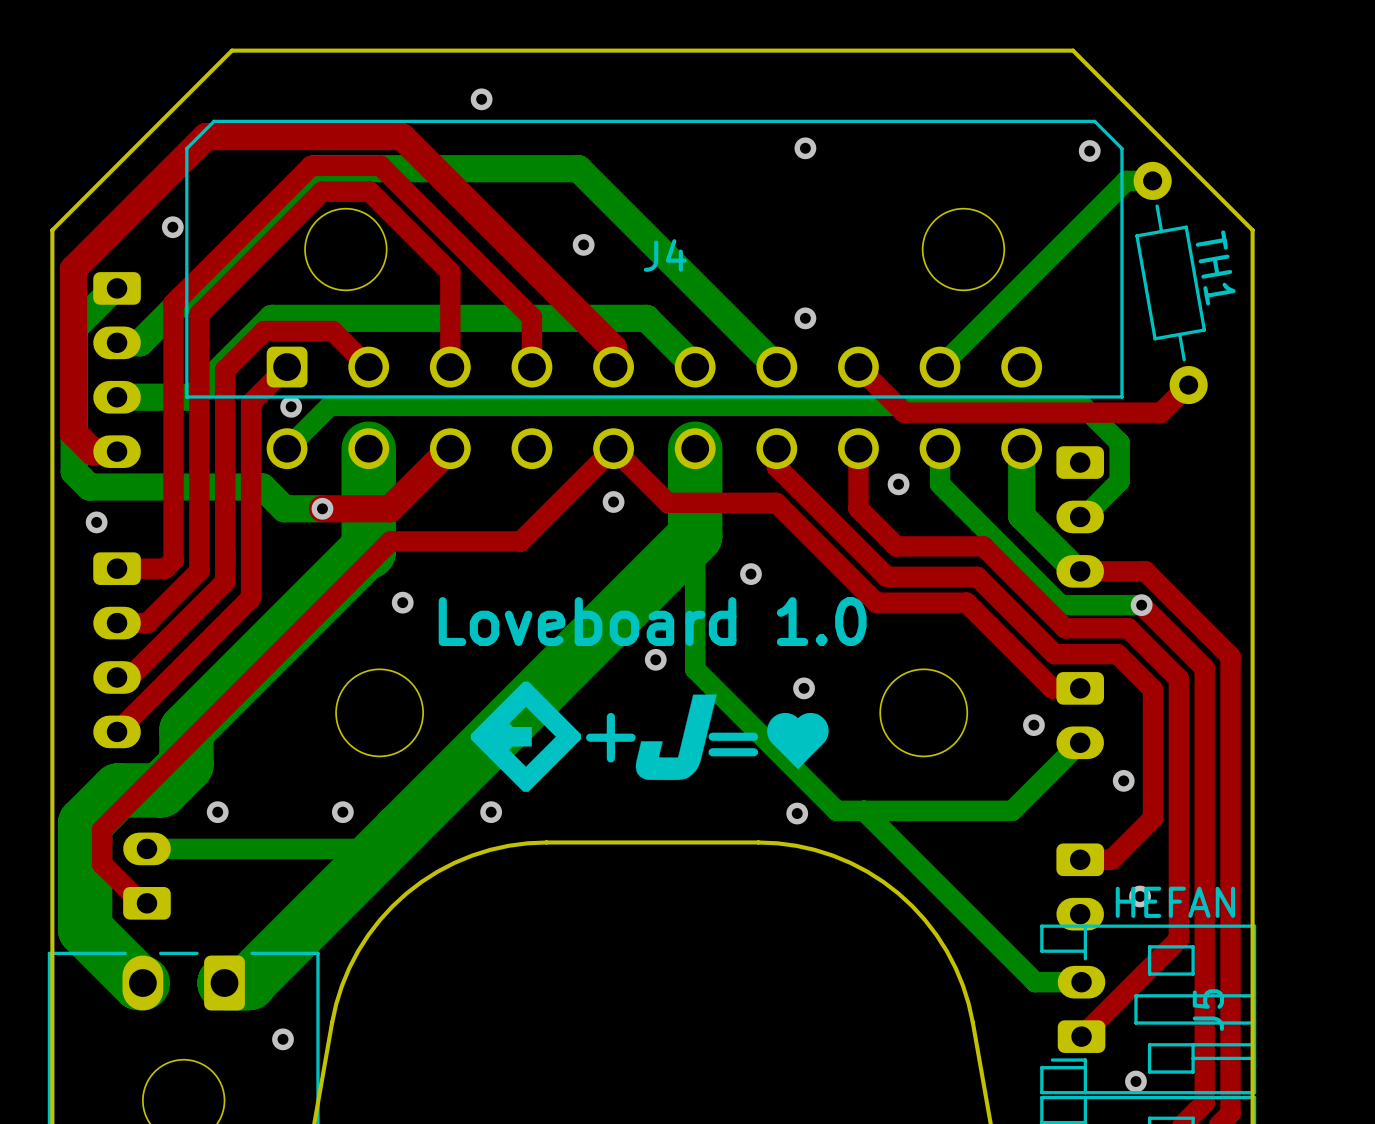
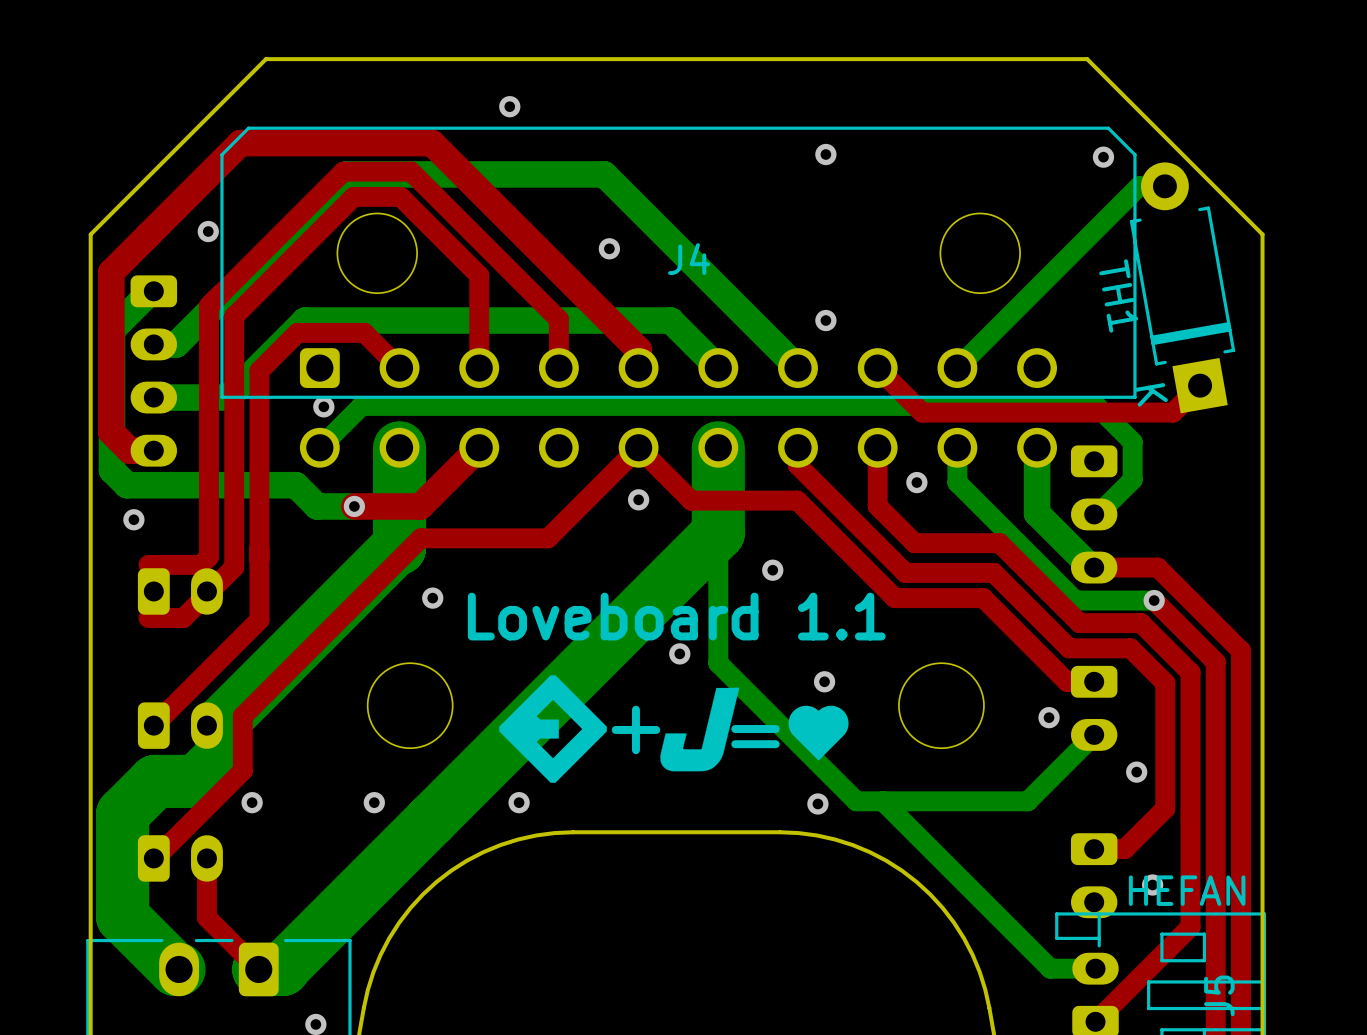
TH1 footprint: [1133, 161, 1208, 405] -> [1129, 162, 1236, 414]
TH1 name position: TH1 (1215, 267) -> TH1 (1118, 295)
top track: (287, 367) (251, 403) (251, 597) (117, 731) -> none
top track: (225, 581) (129, 677) (111, 677) -> (259, 577) (259, 620) (153, 725)
part: none -> (180, 591)
text: Loveboard 1.0 (652, 621) -> Loveboard 1.1 (676, 616)
part: (117, 650) -> none
top track: (208, 723) (102, 829) (102, 863) (141, 903) -> (242, 716) (242, 770) (153, 858)
part: none -> (180, 725)
bottom track: (141, 848) (382, 848) -> none
top track: none -> (206, 858) (206, 917) (258, 969)
part rotation: 0° (146, 876) -> 90° clockwise (180, 858)

